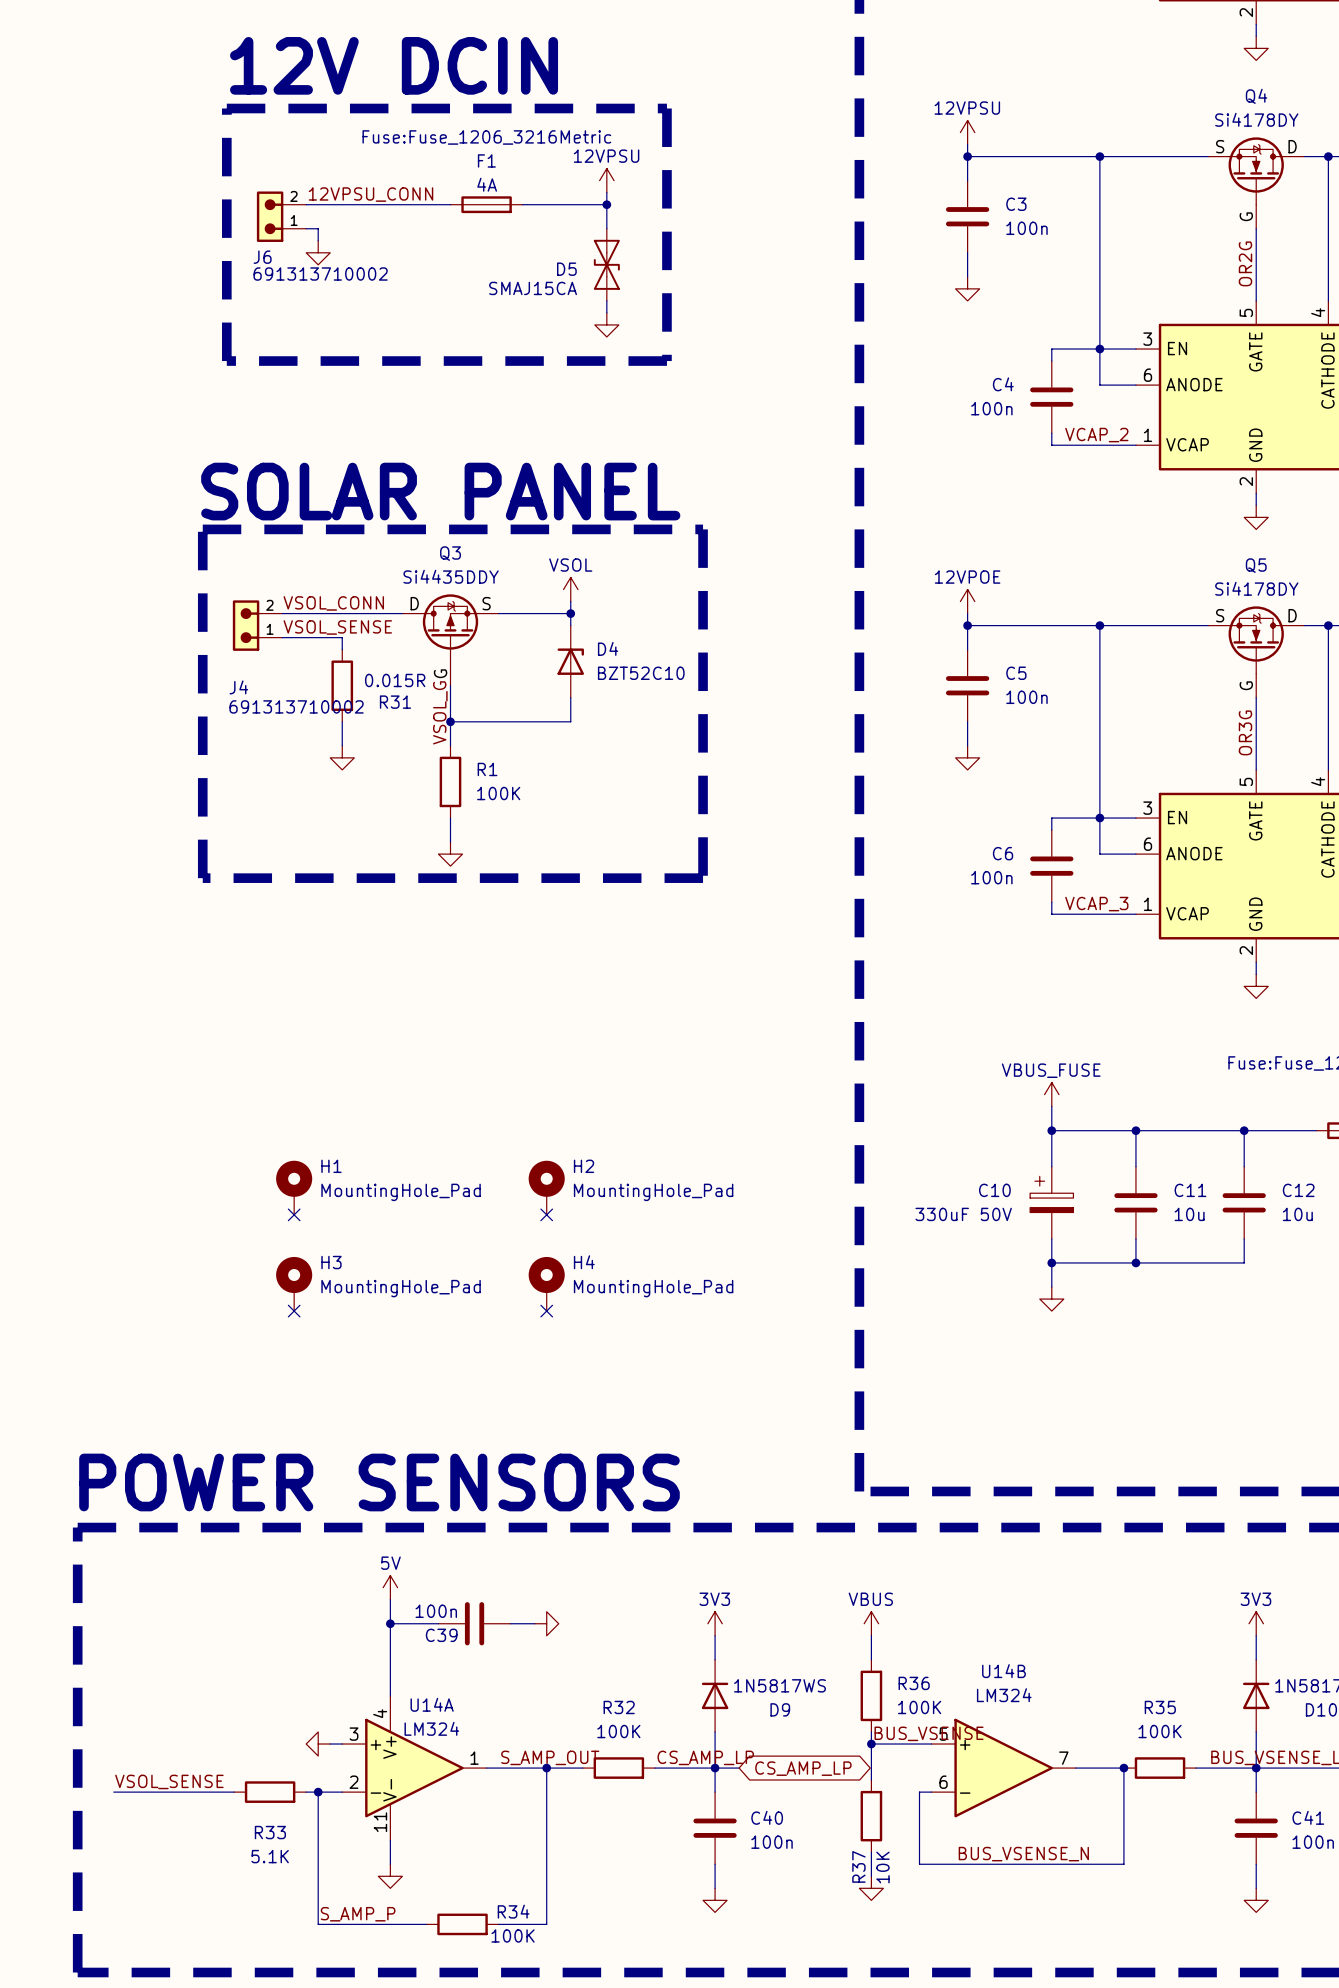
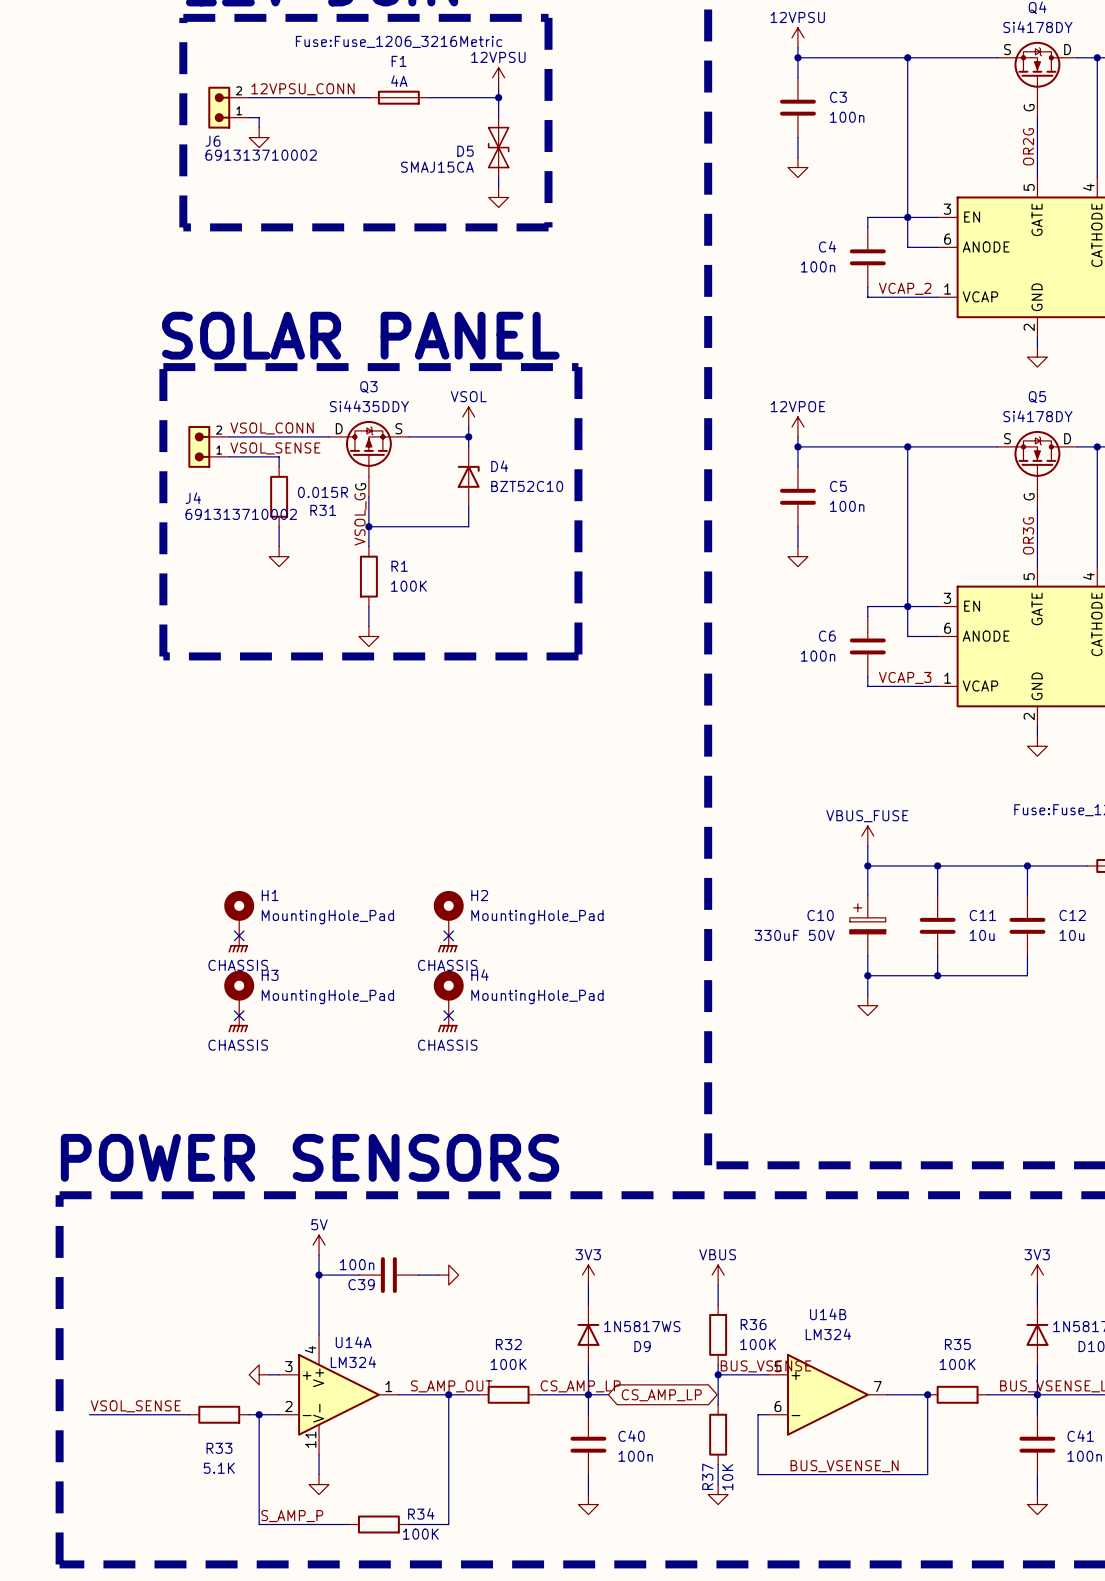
power symbol: none -> CHASSIS (238, 944)
power symbol: none -> CHASSIS (447, 944)
power symbol: none -> CHASSIS (238, 1024)
power symbol: none -> CHASSIS (447, 1024)

